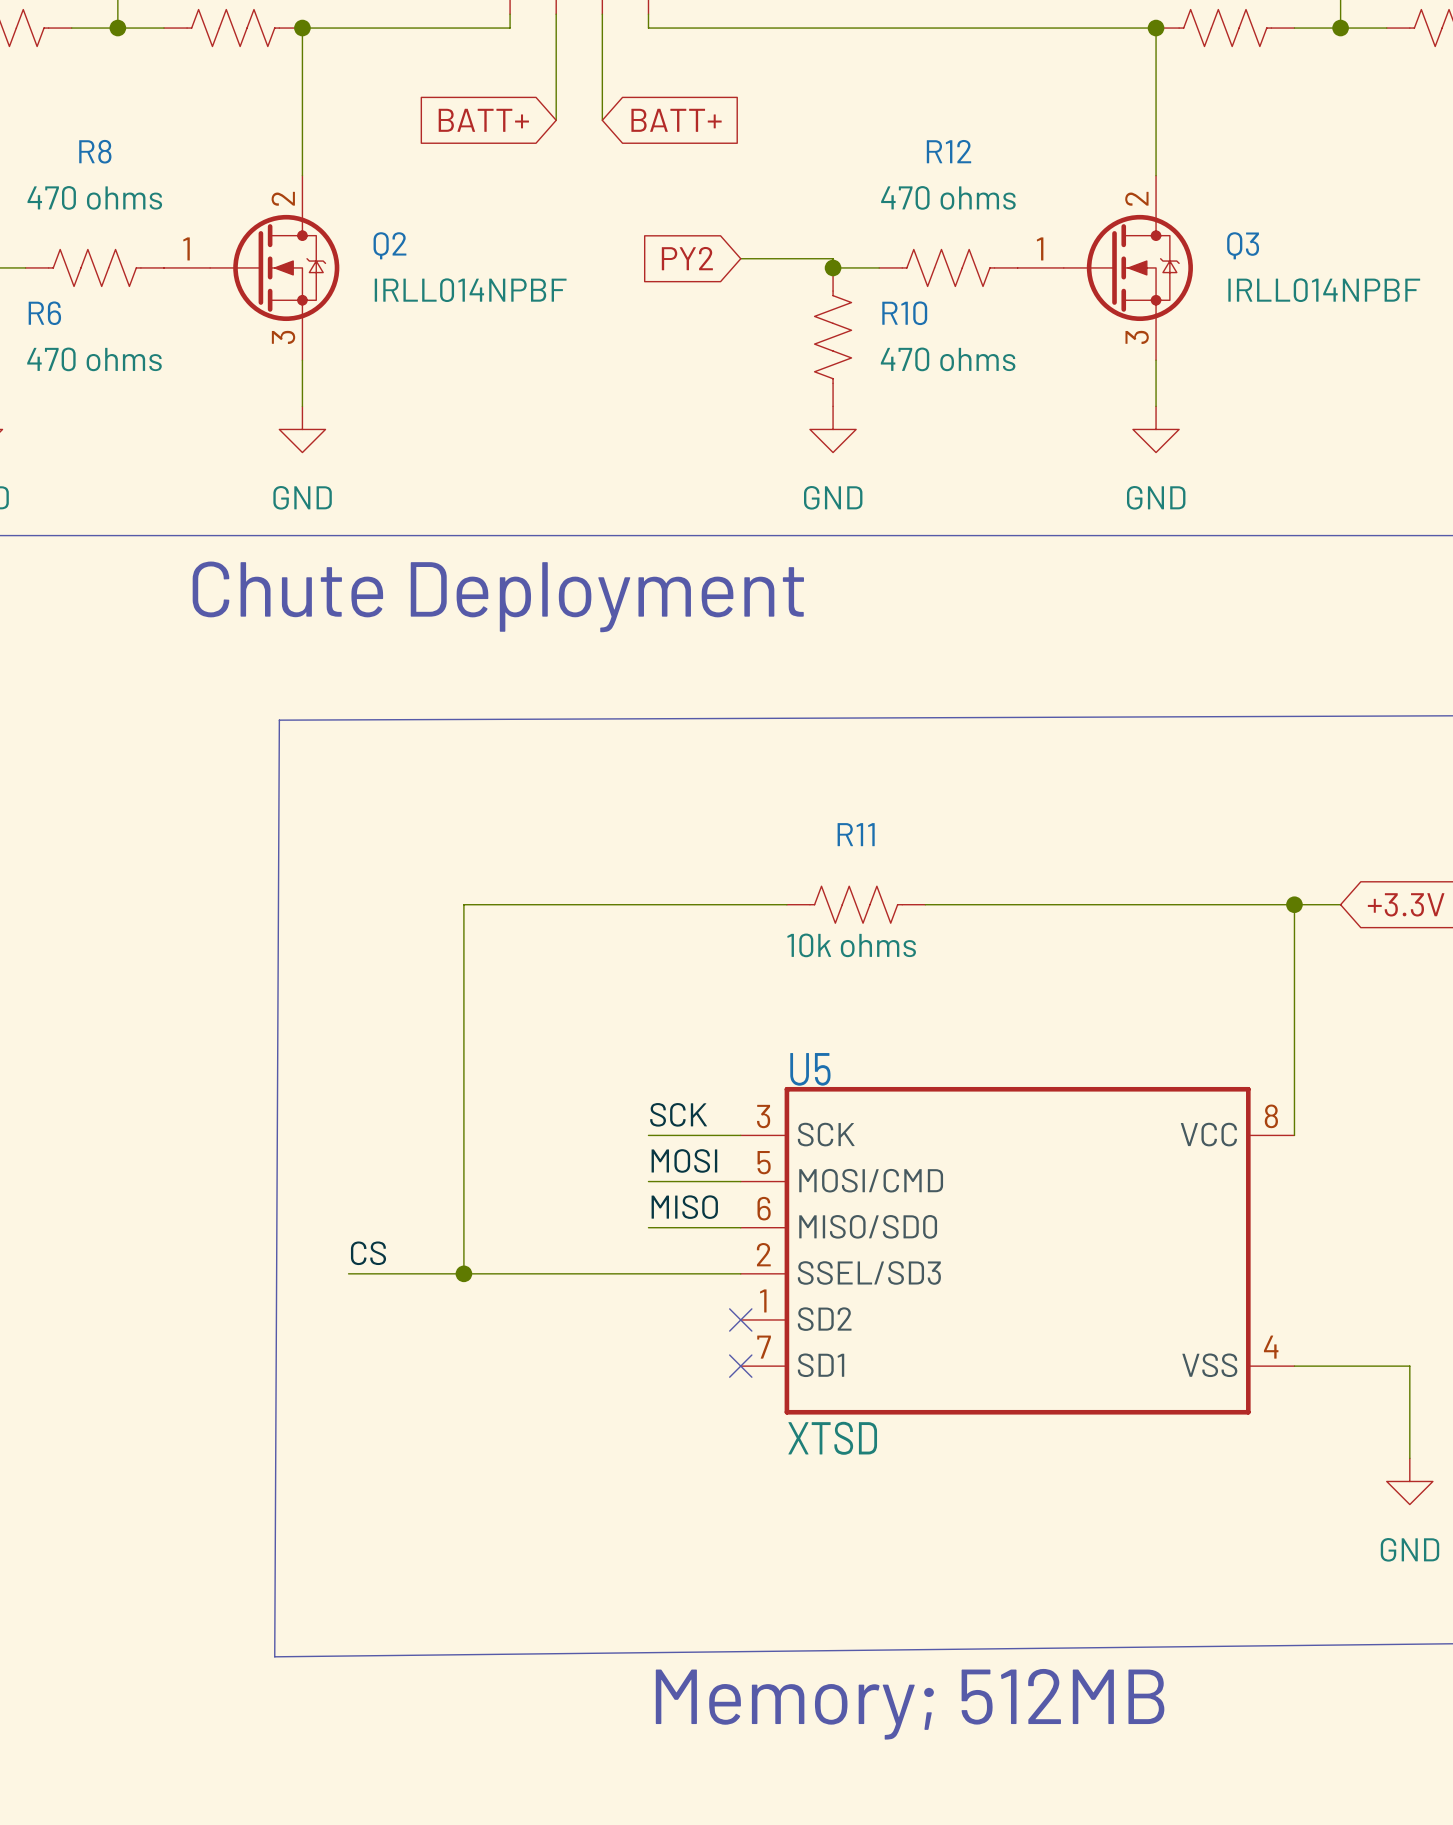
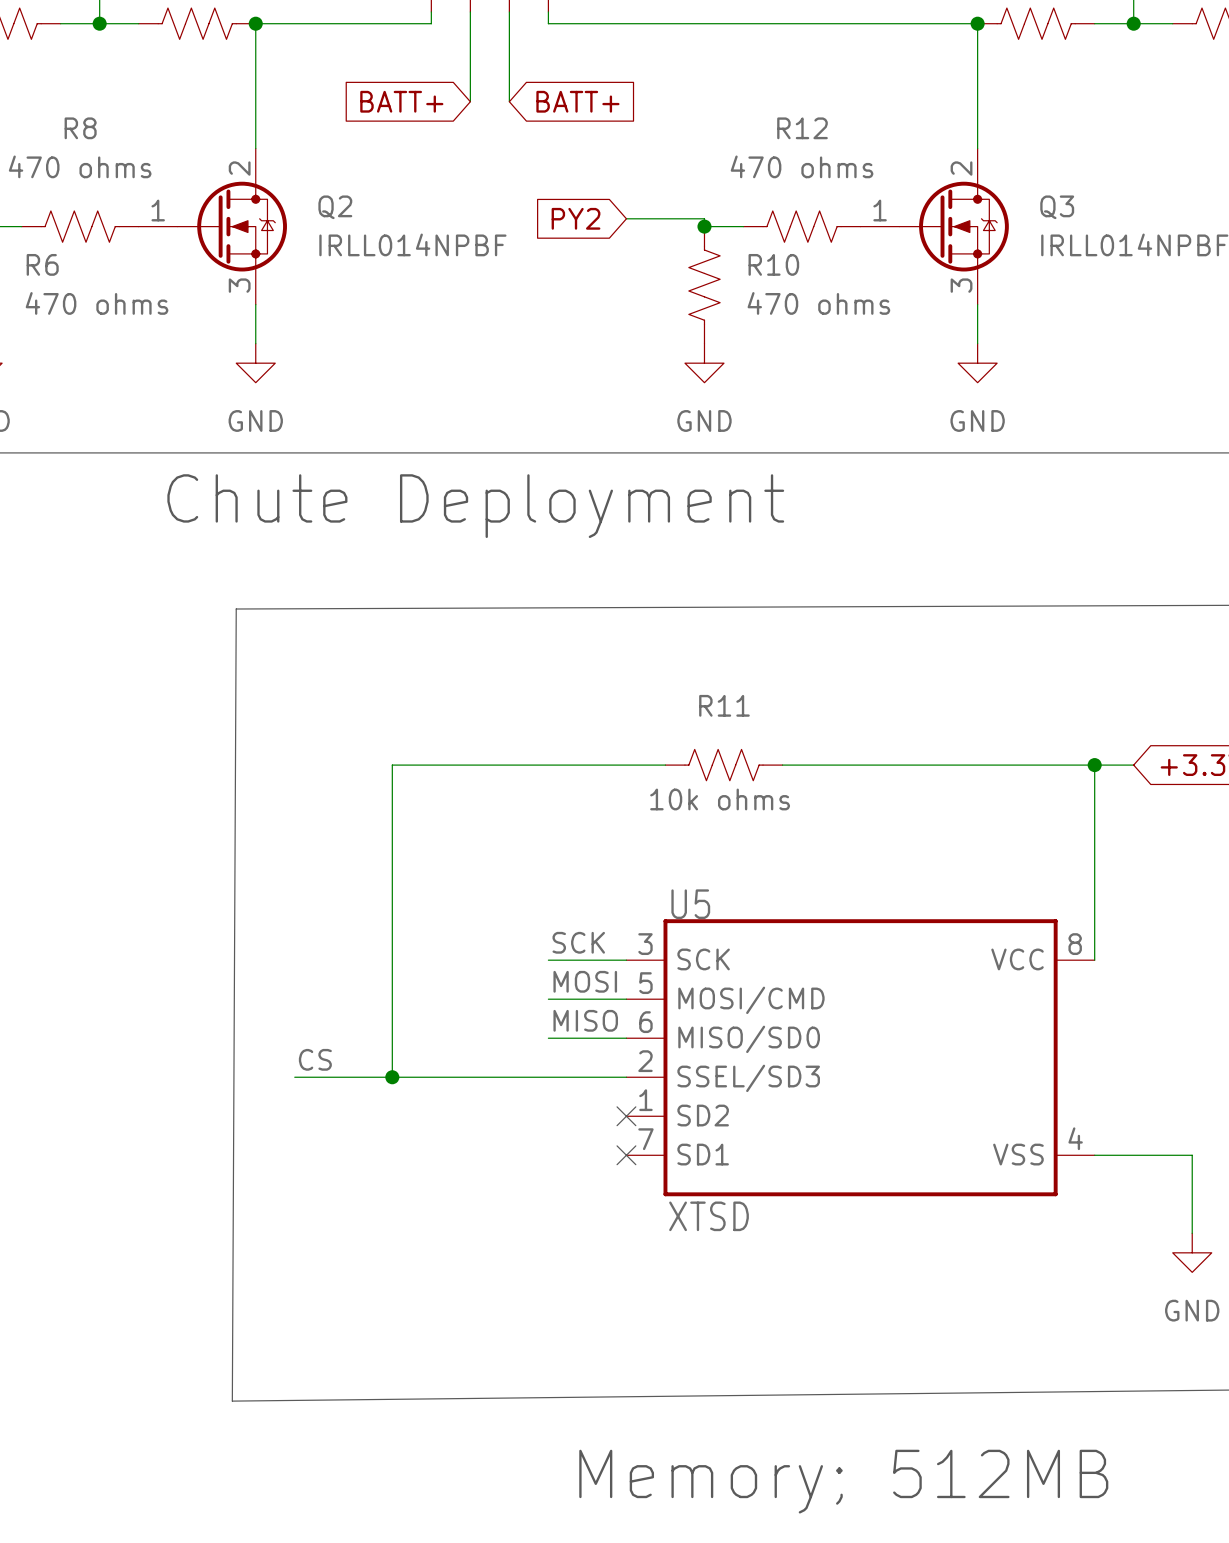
text position: Memory; 512MB (910, 1704) -> Memory; 512MB (843, 1481)

